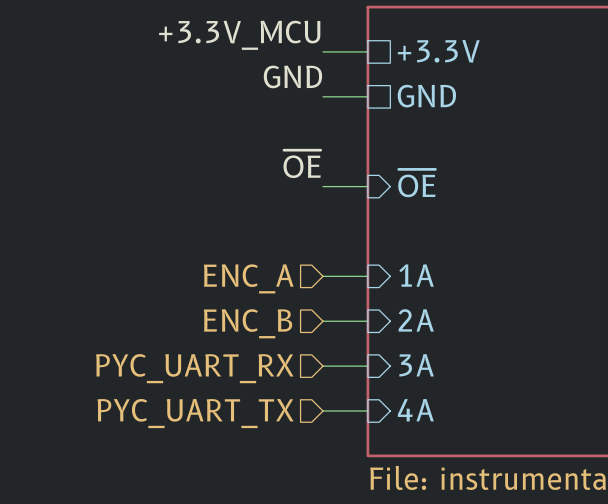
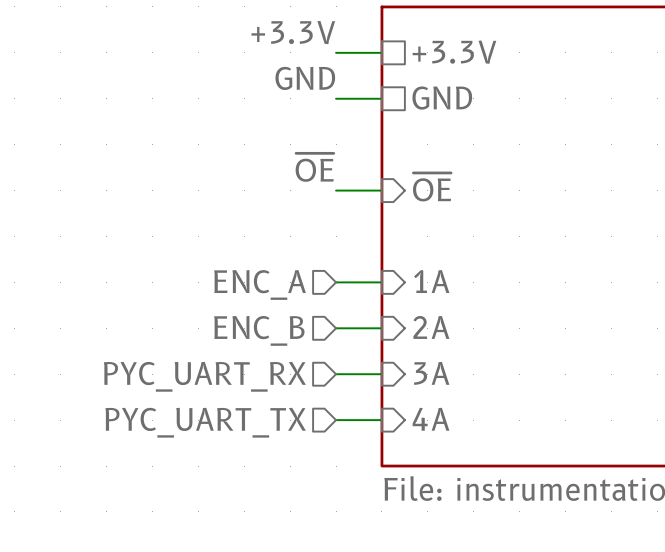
label: +3.3V_MCU (239, 35) -> +3.3V (293, 32)

